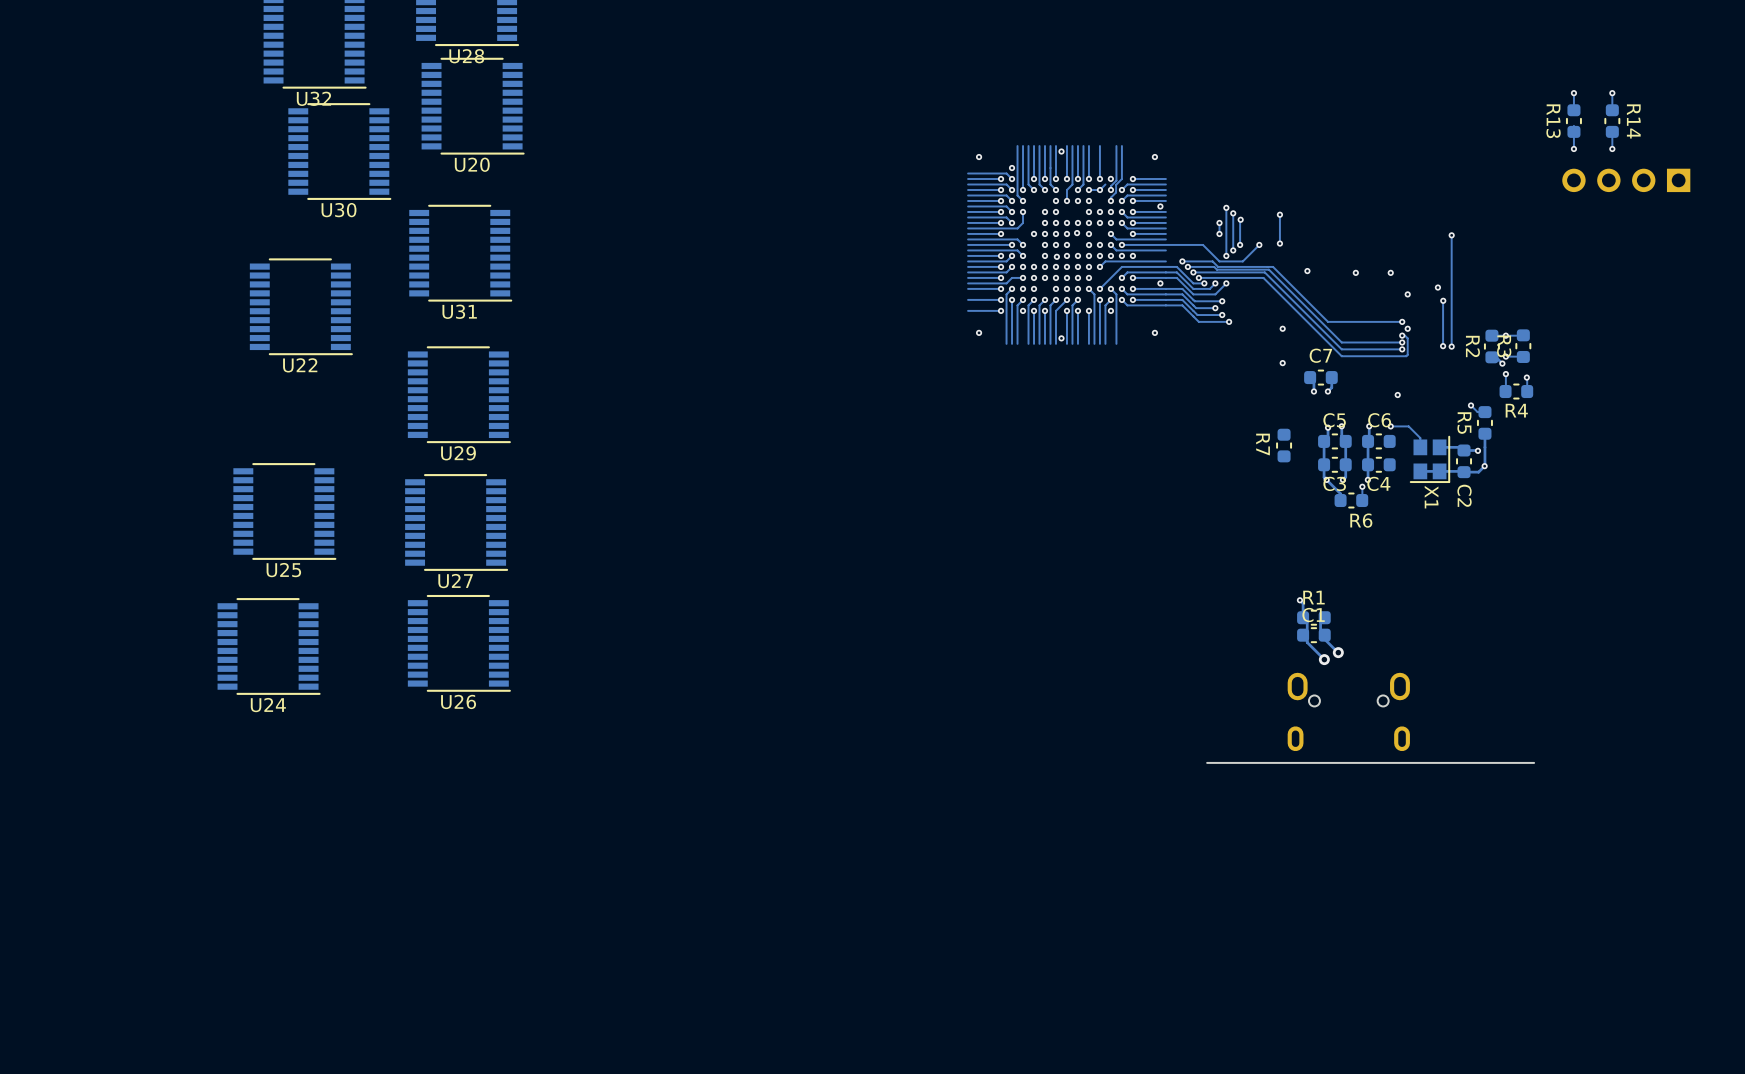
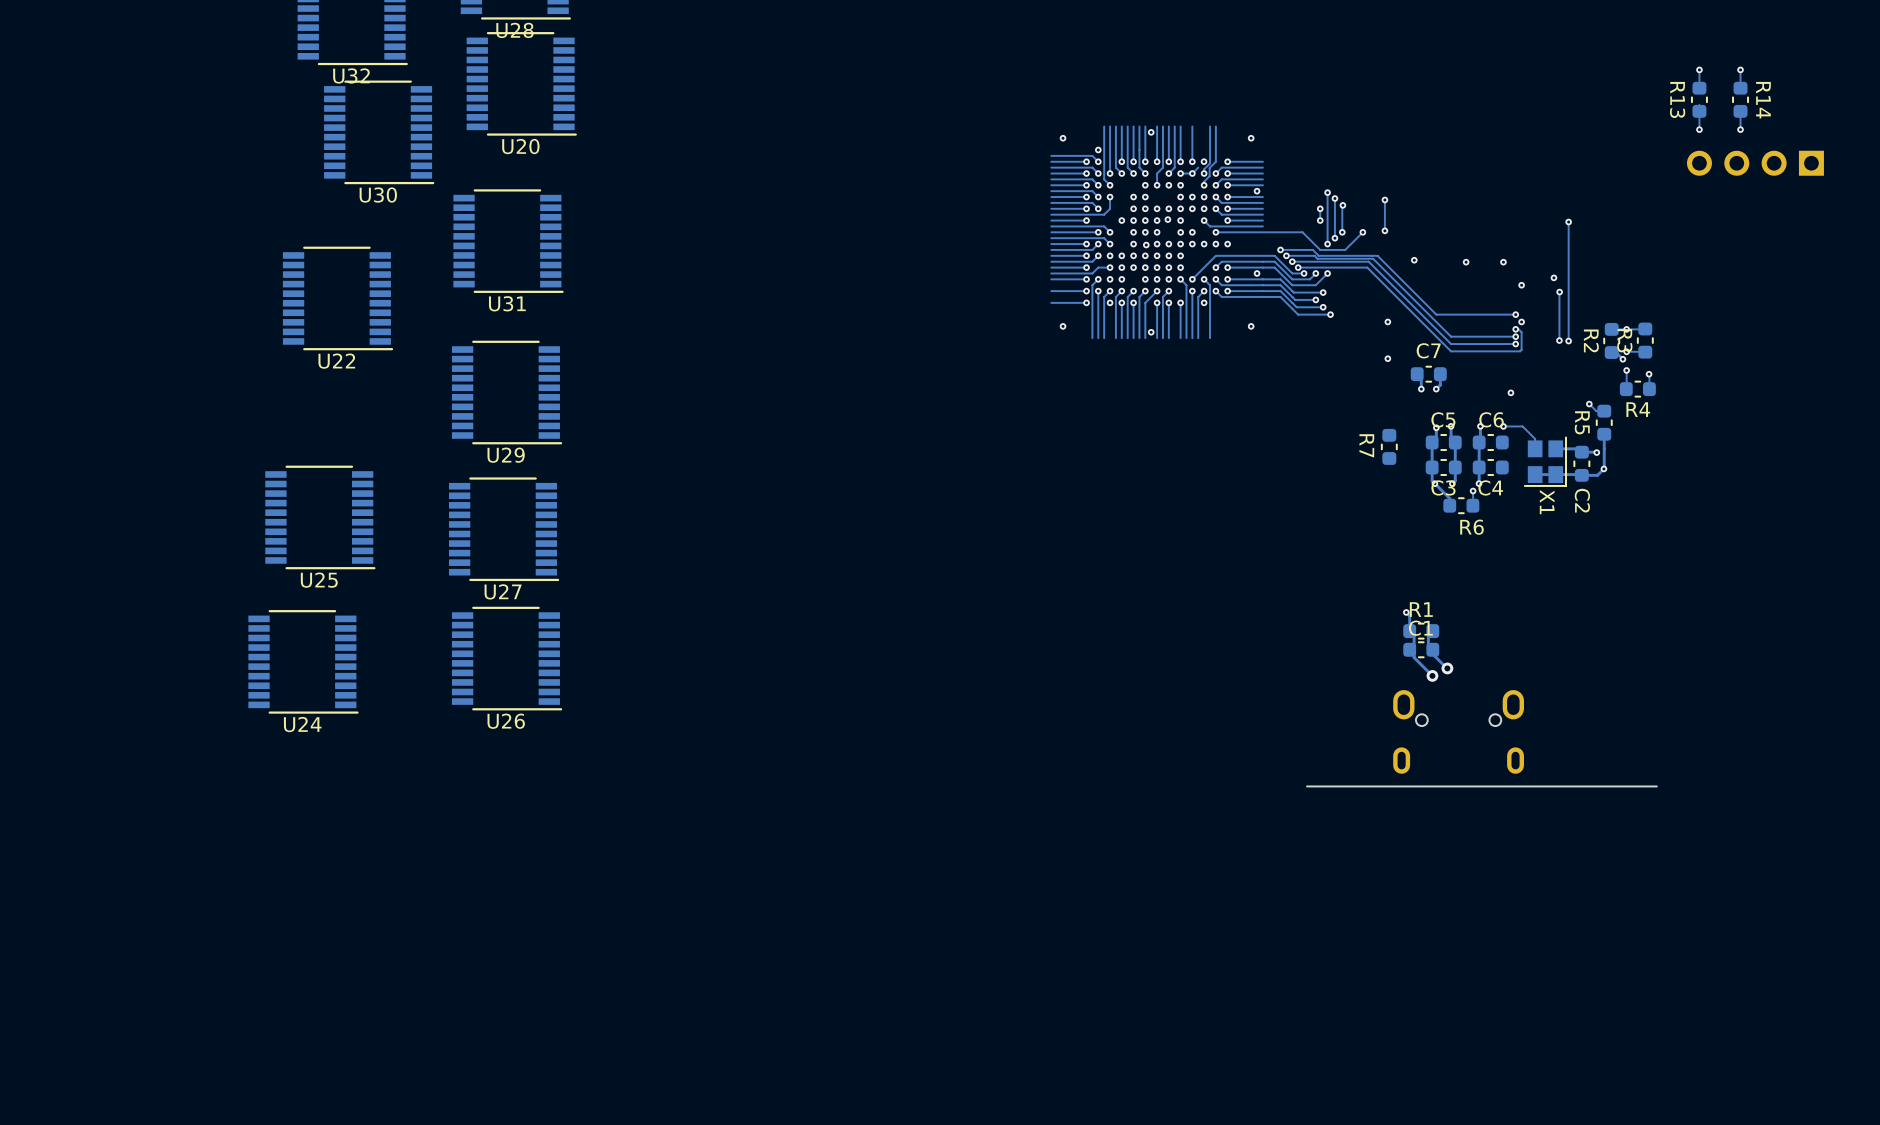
track: (1110, 244) (1116, 250) (1165, 250) -> none
via: (1110, 244) -> none
track: (1165, 261) (1105, 261) (1099, 266) -> none
via: (1099, 266) -> none

